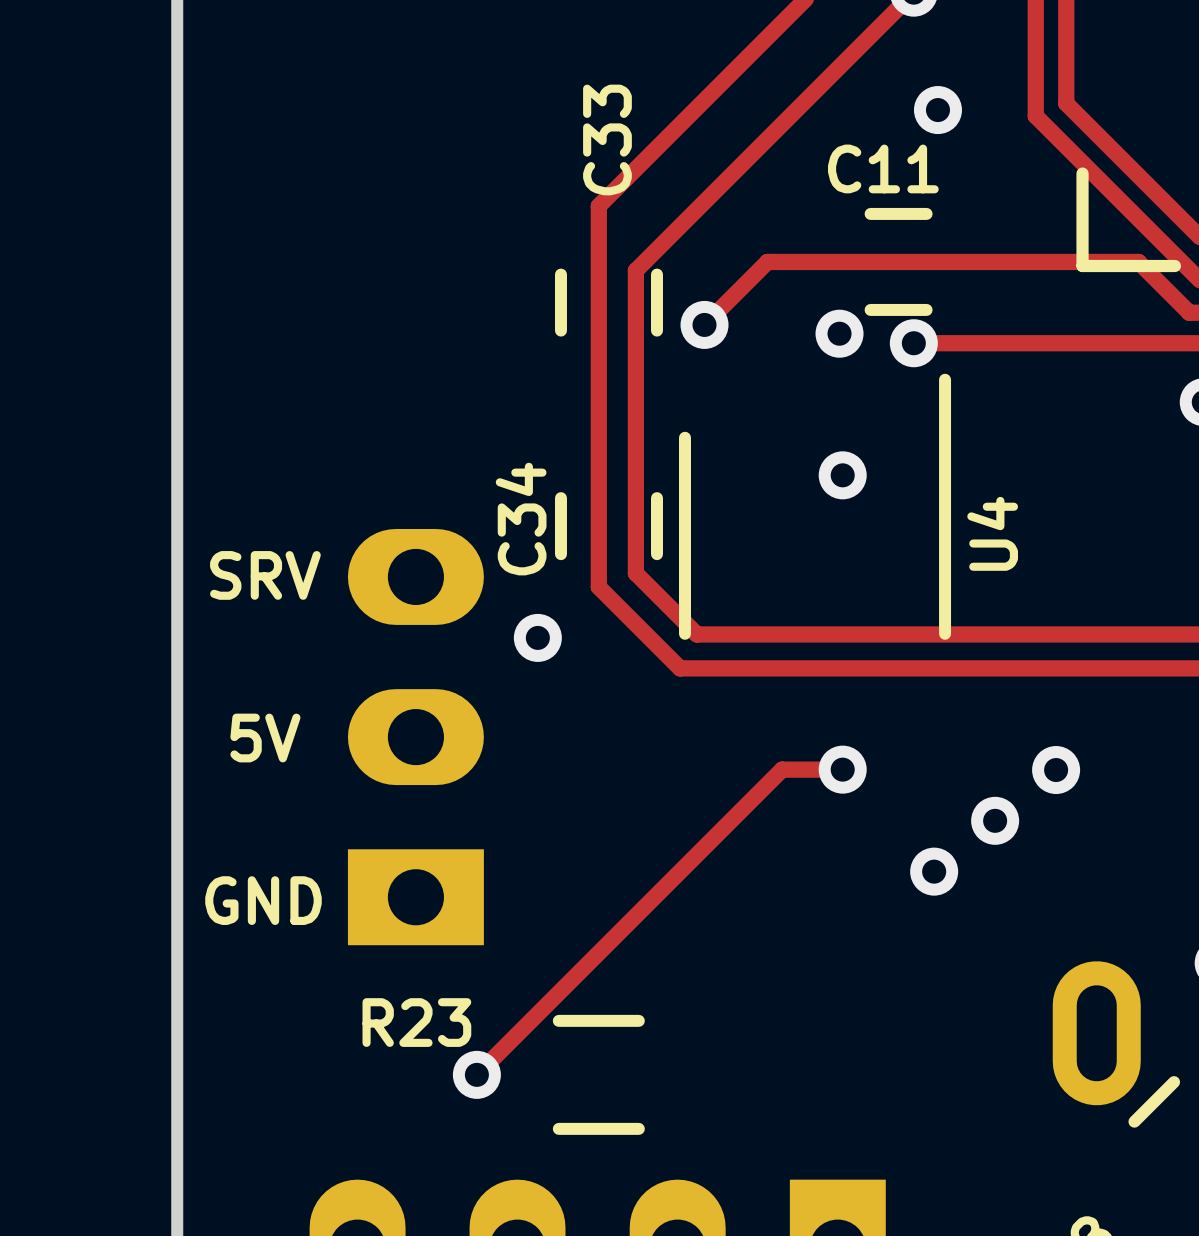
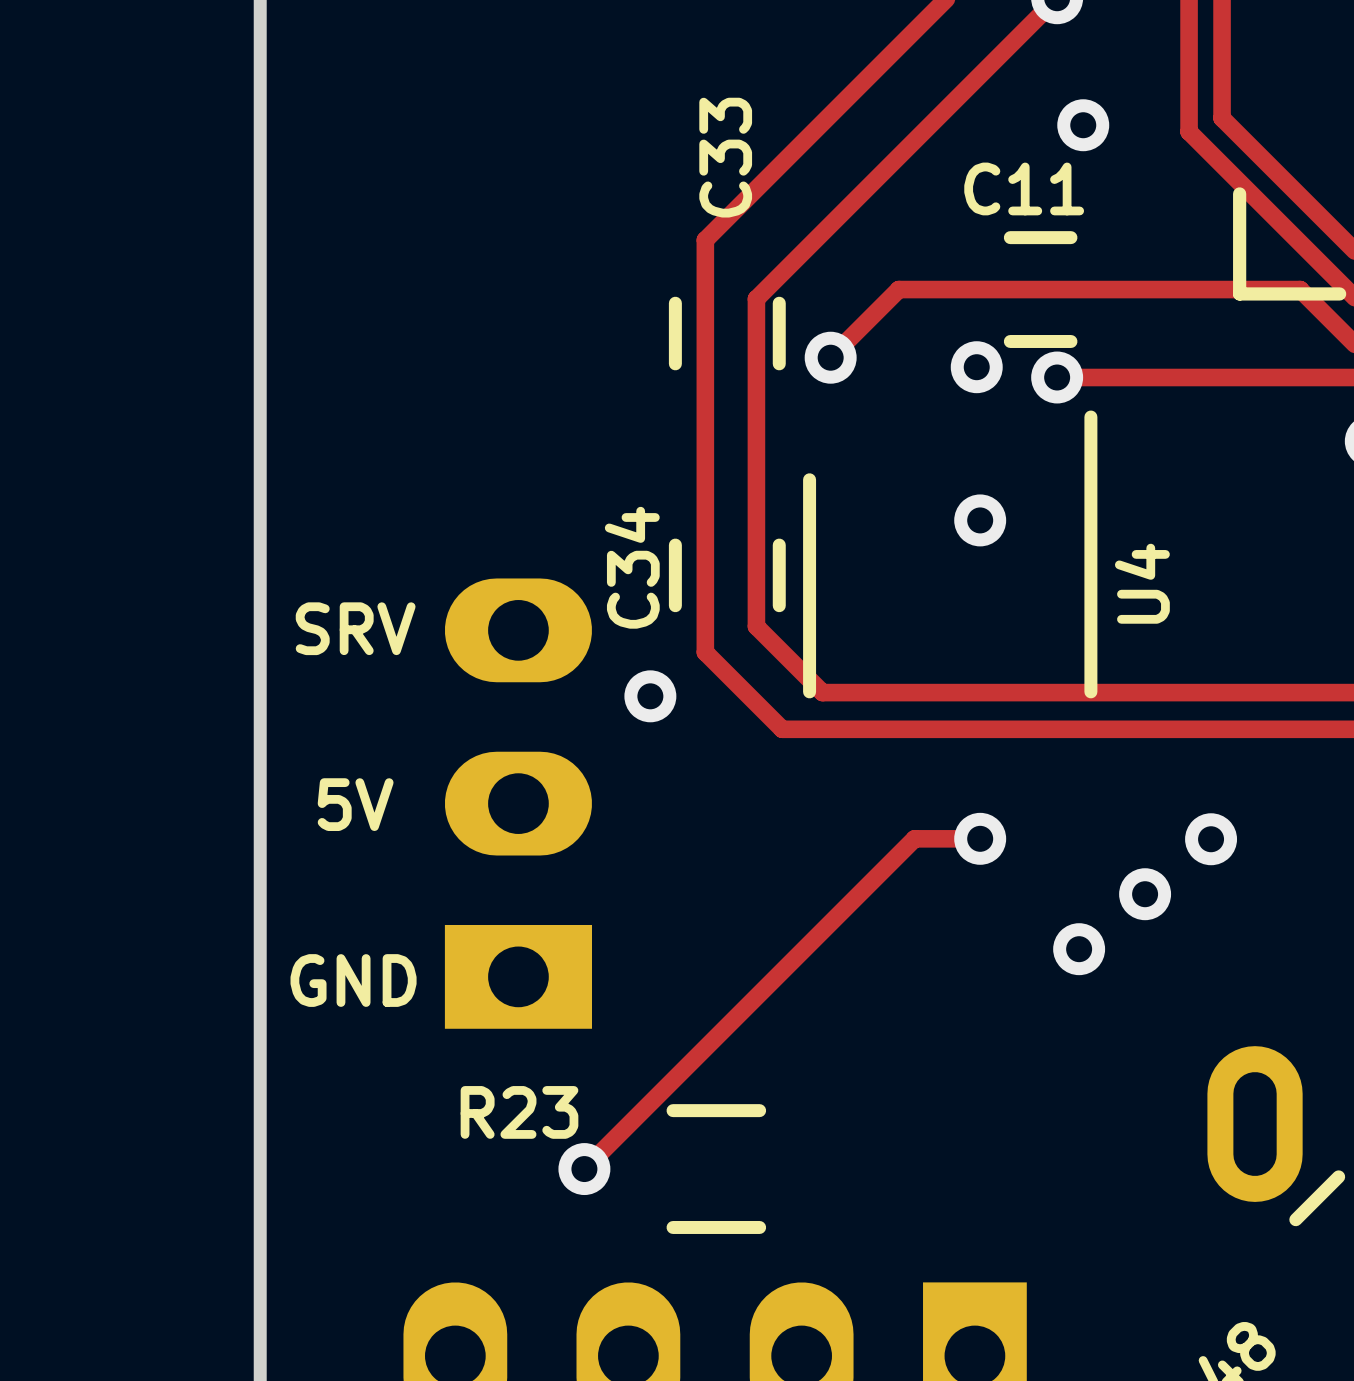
track: (598, 206) (598, 587) (680, 668) -> (716, 229) (705, 240) (705, 652) (782, 729) (804, 729)

